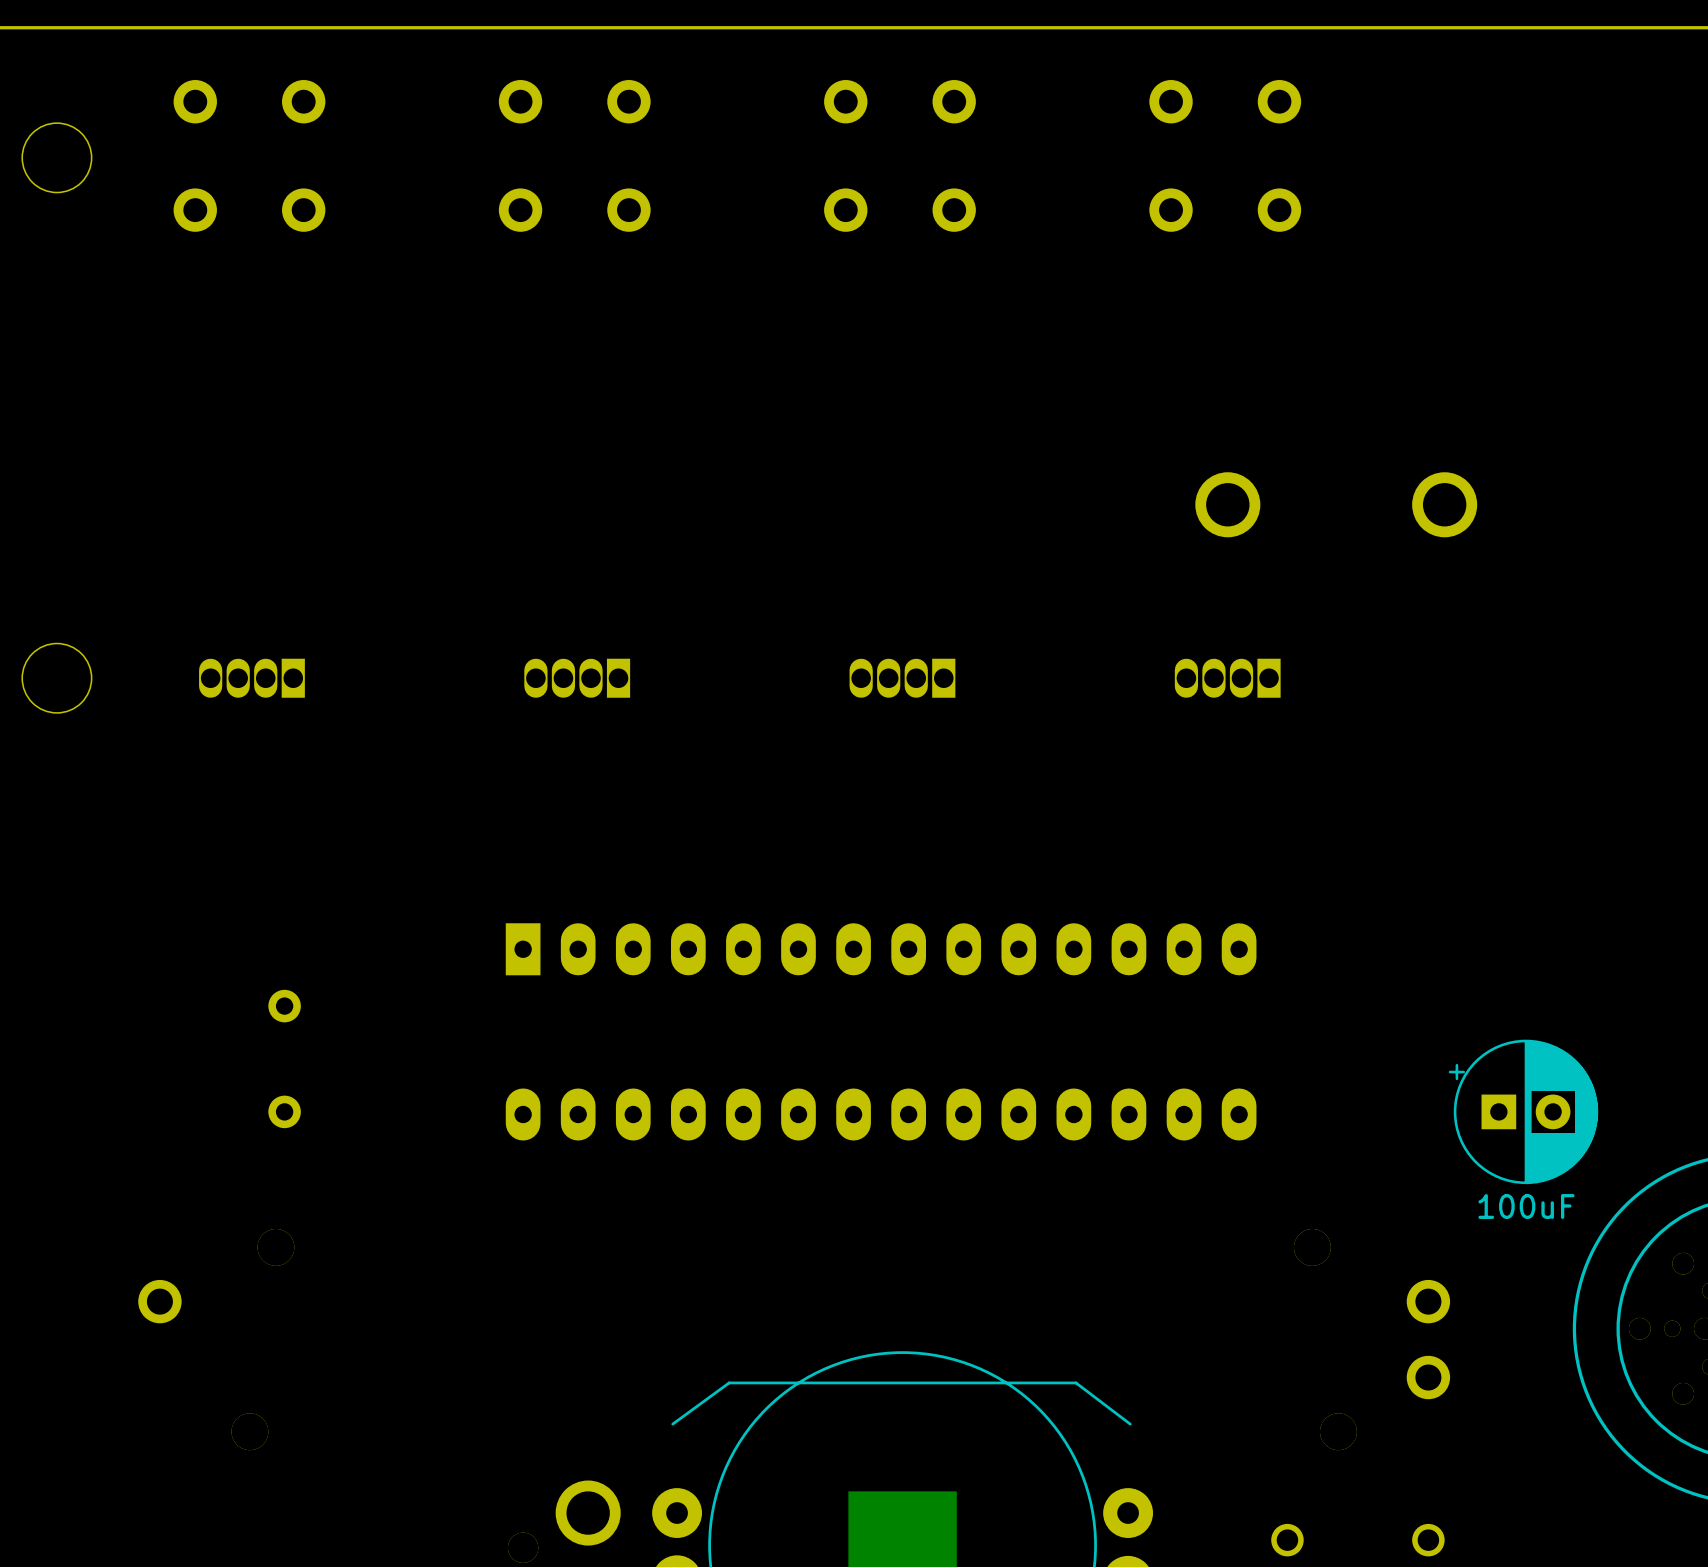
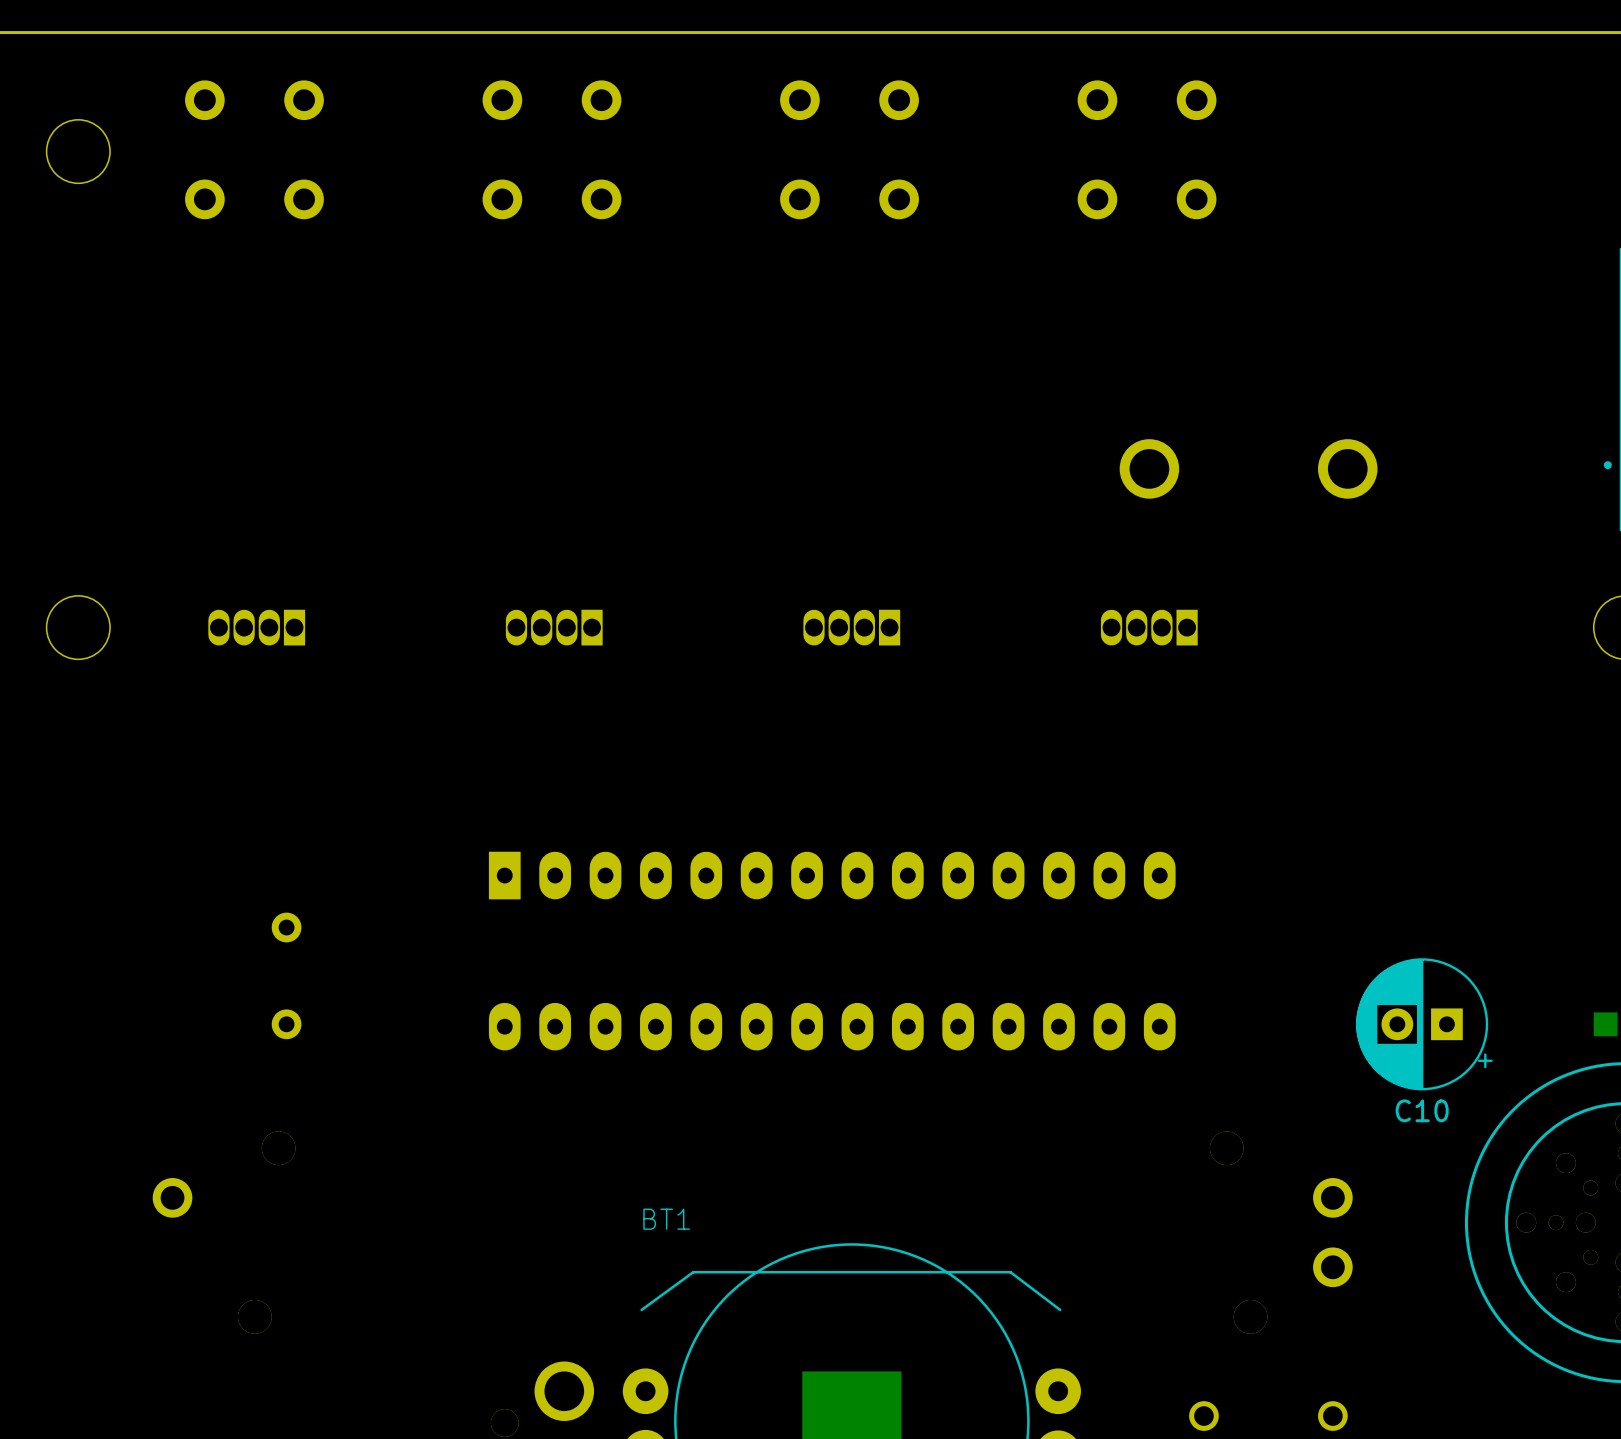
part: 100uF (1523, 1111) -> none
C10: none -> (1424, 1024)
BT1 name: none -> BT1 (666, 1219)

